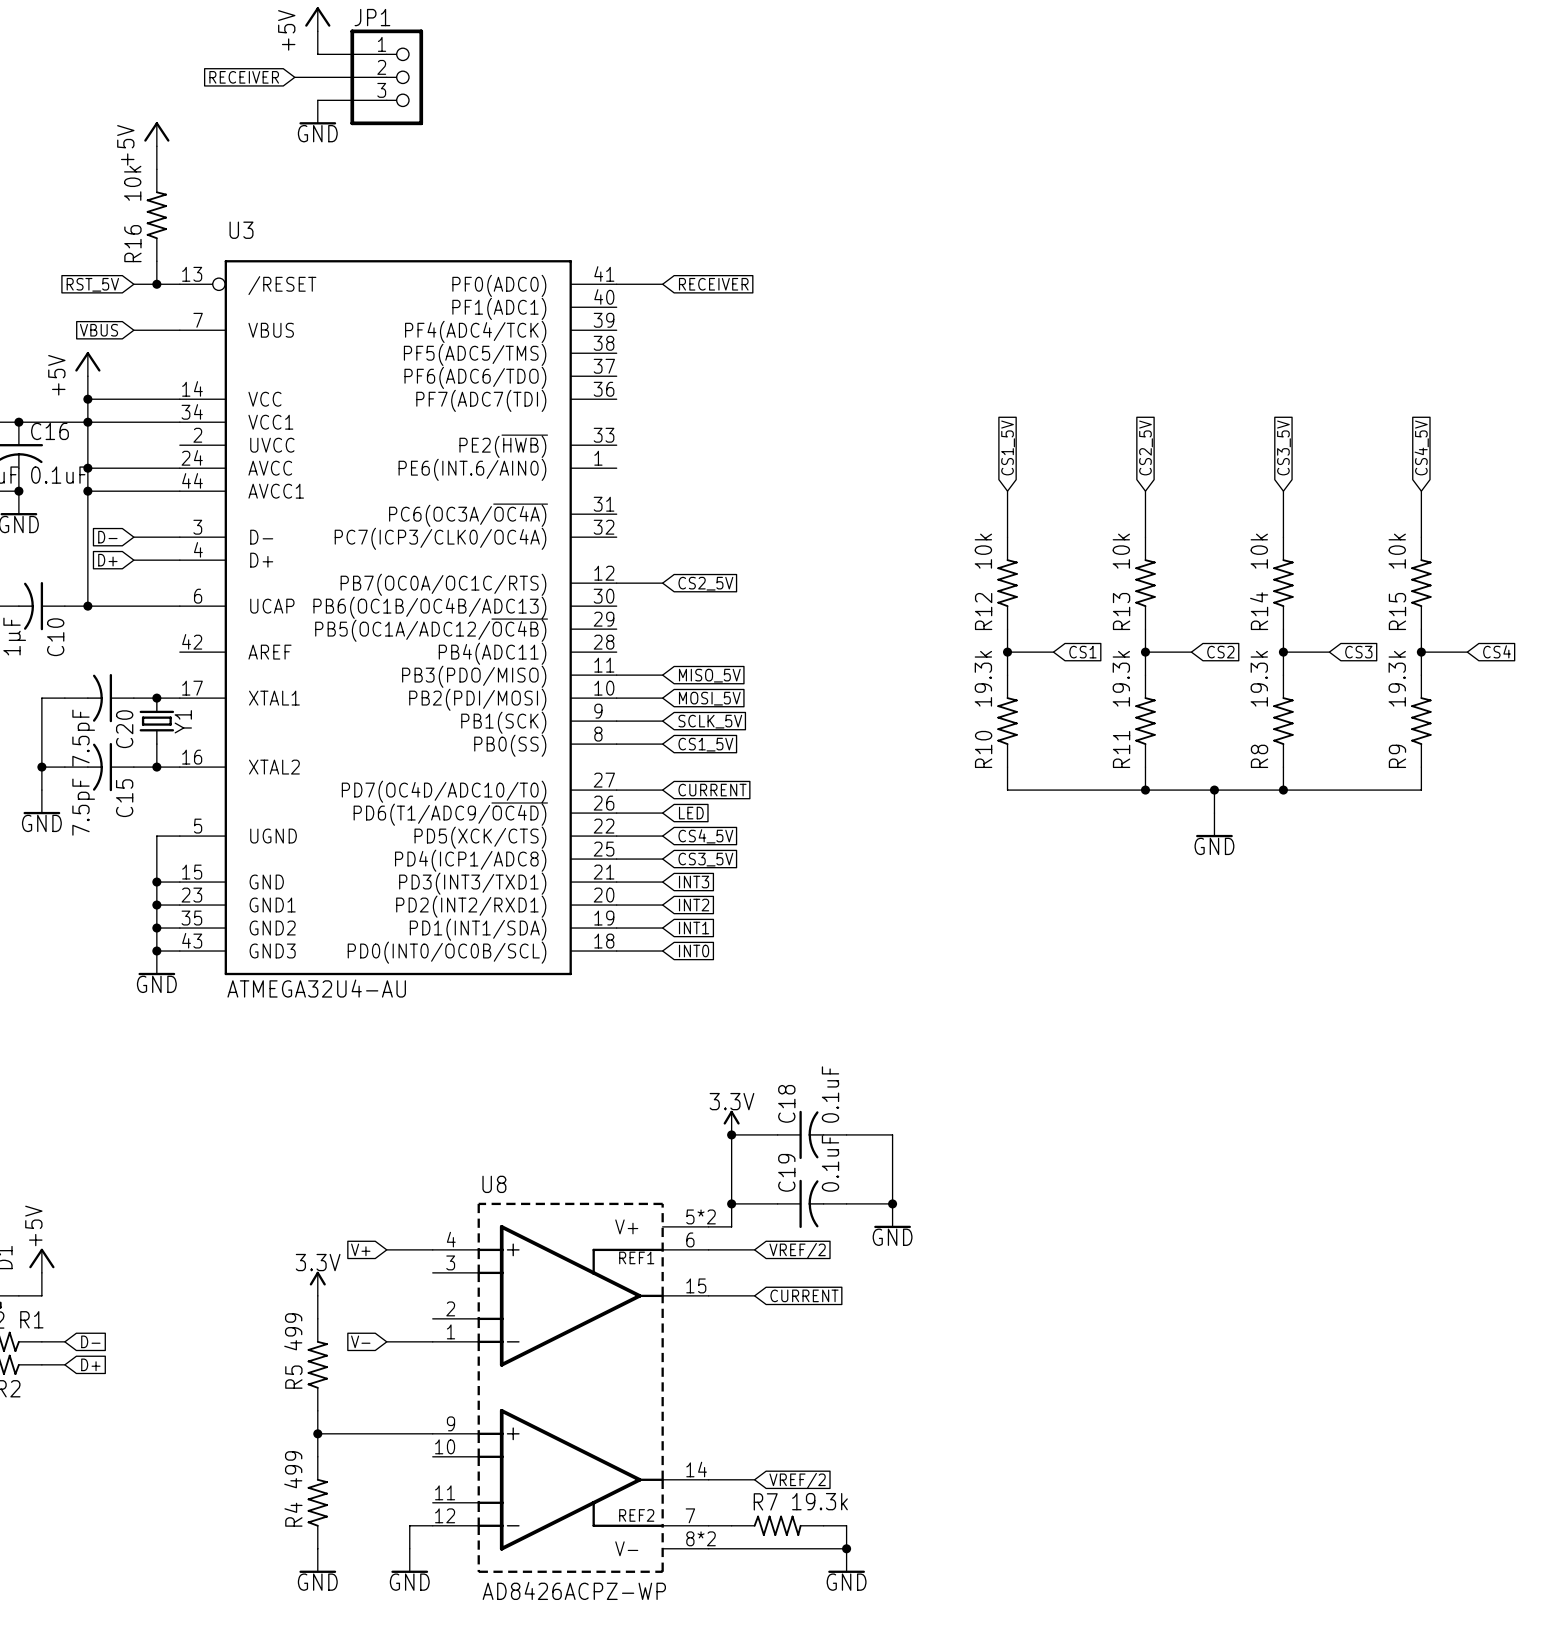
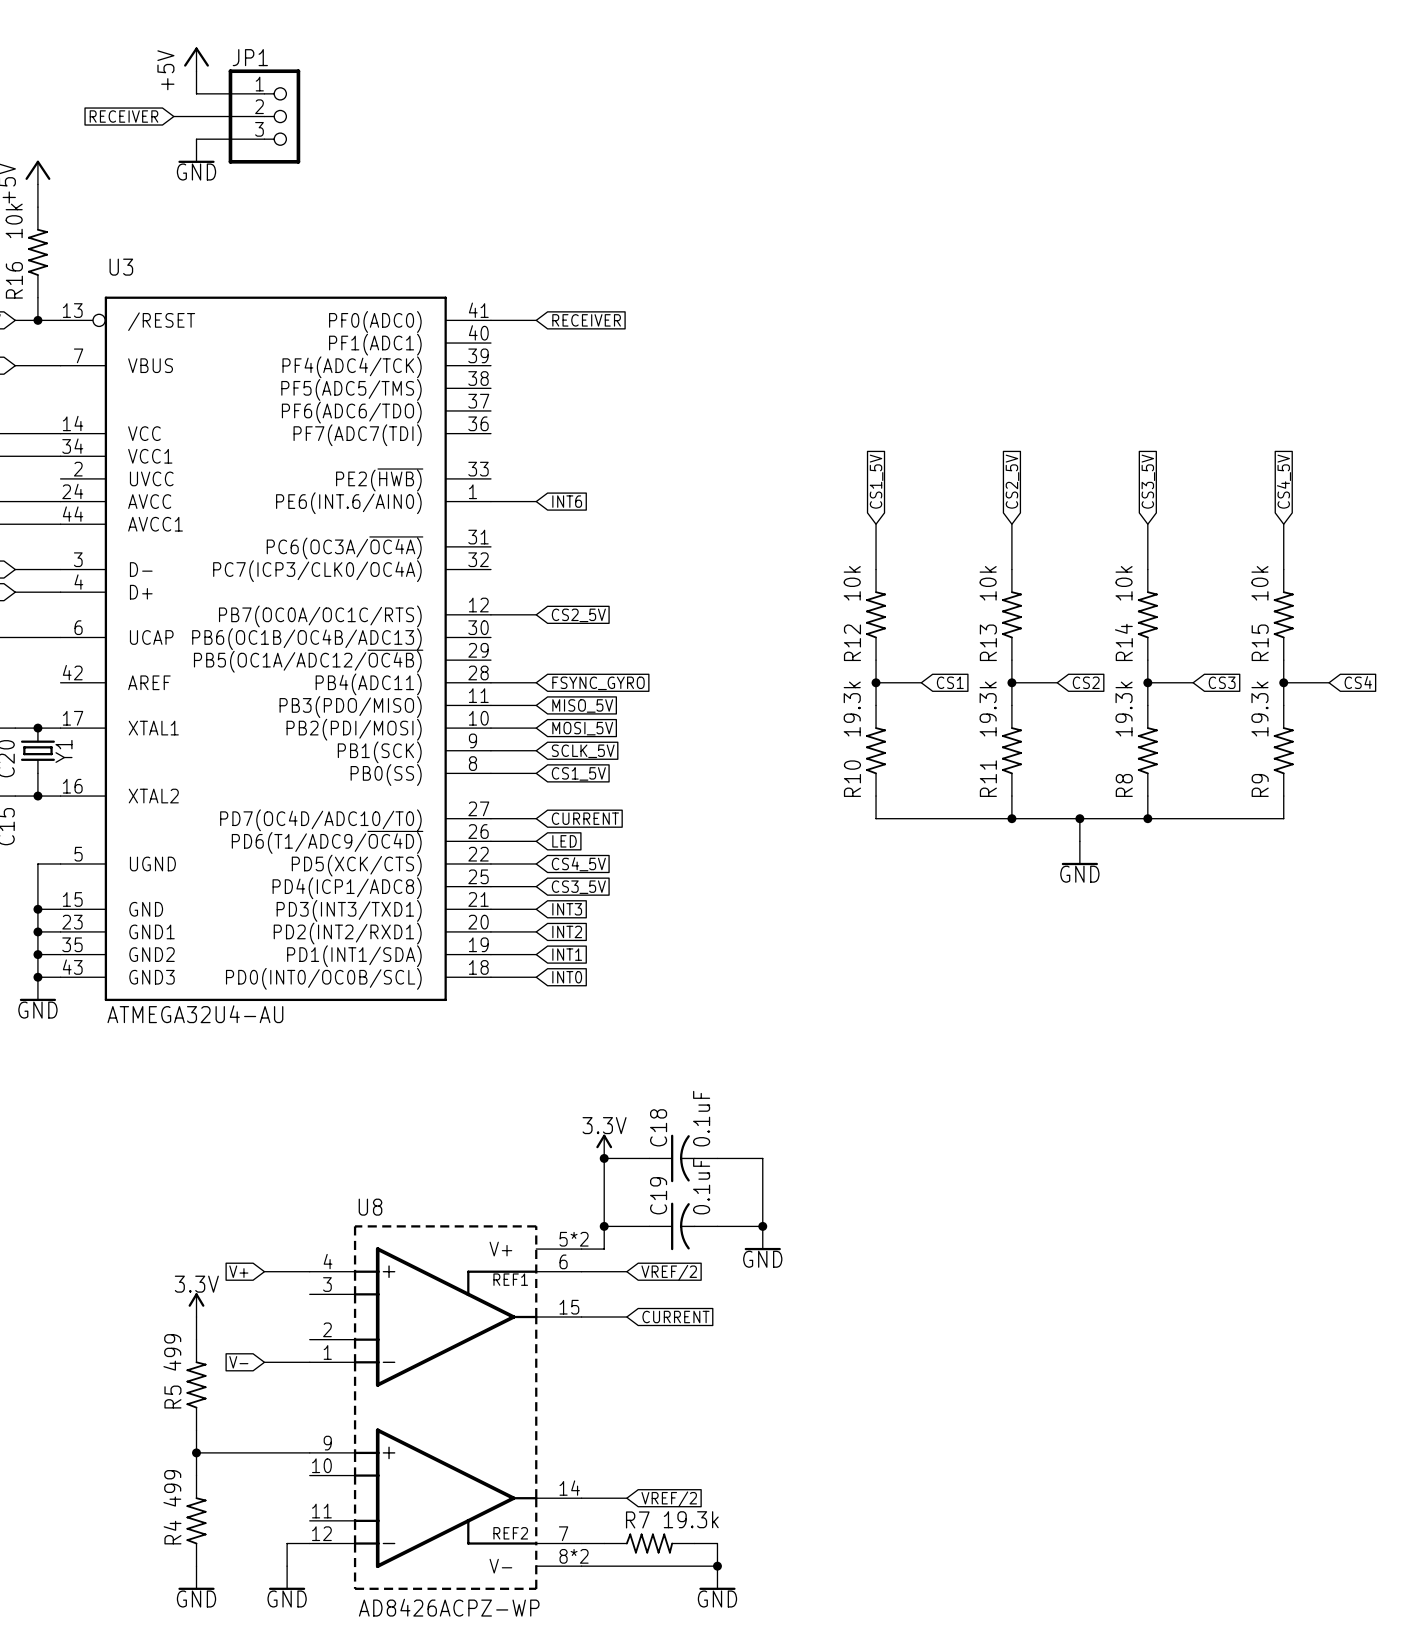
wire: none -> (490, 501) (536, 501)
global label: none -> INT6 (567, 501)
wire: none -> (490, 682) (536, 682)
global label: none -> FSYNC_GYRO (598, 683)

